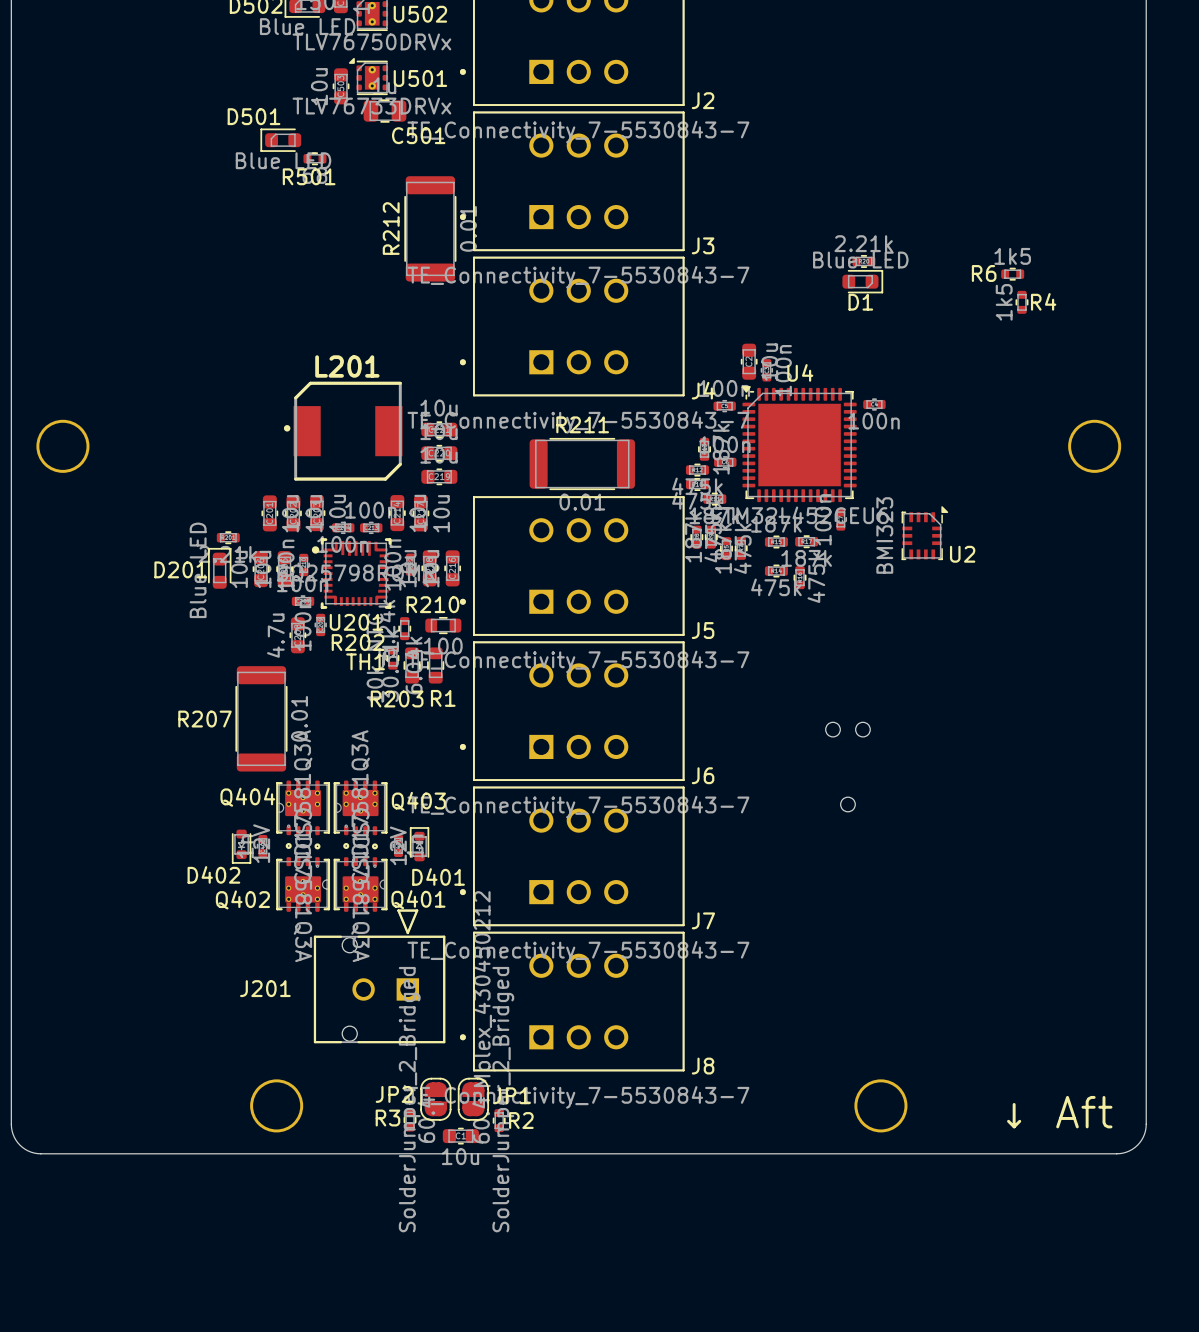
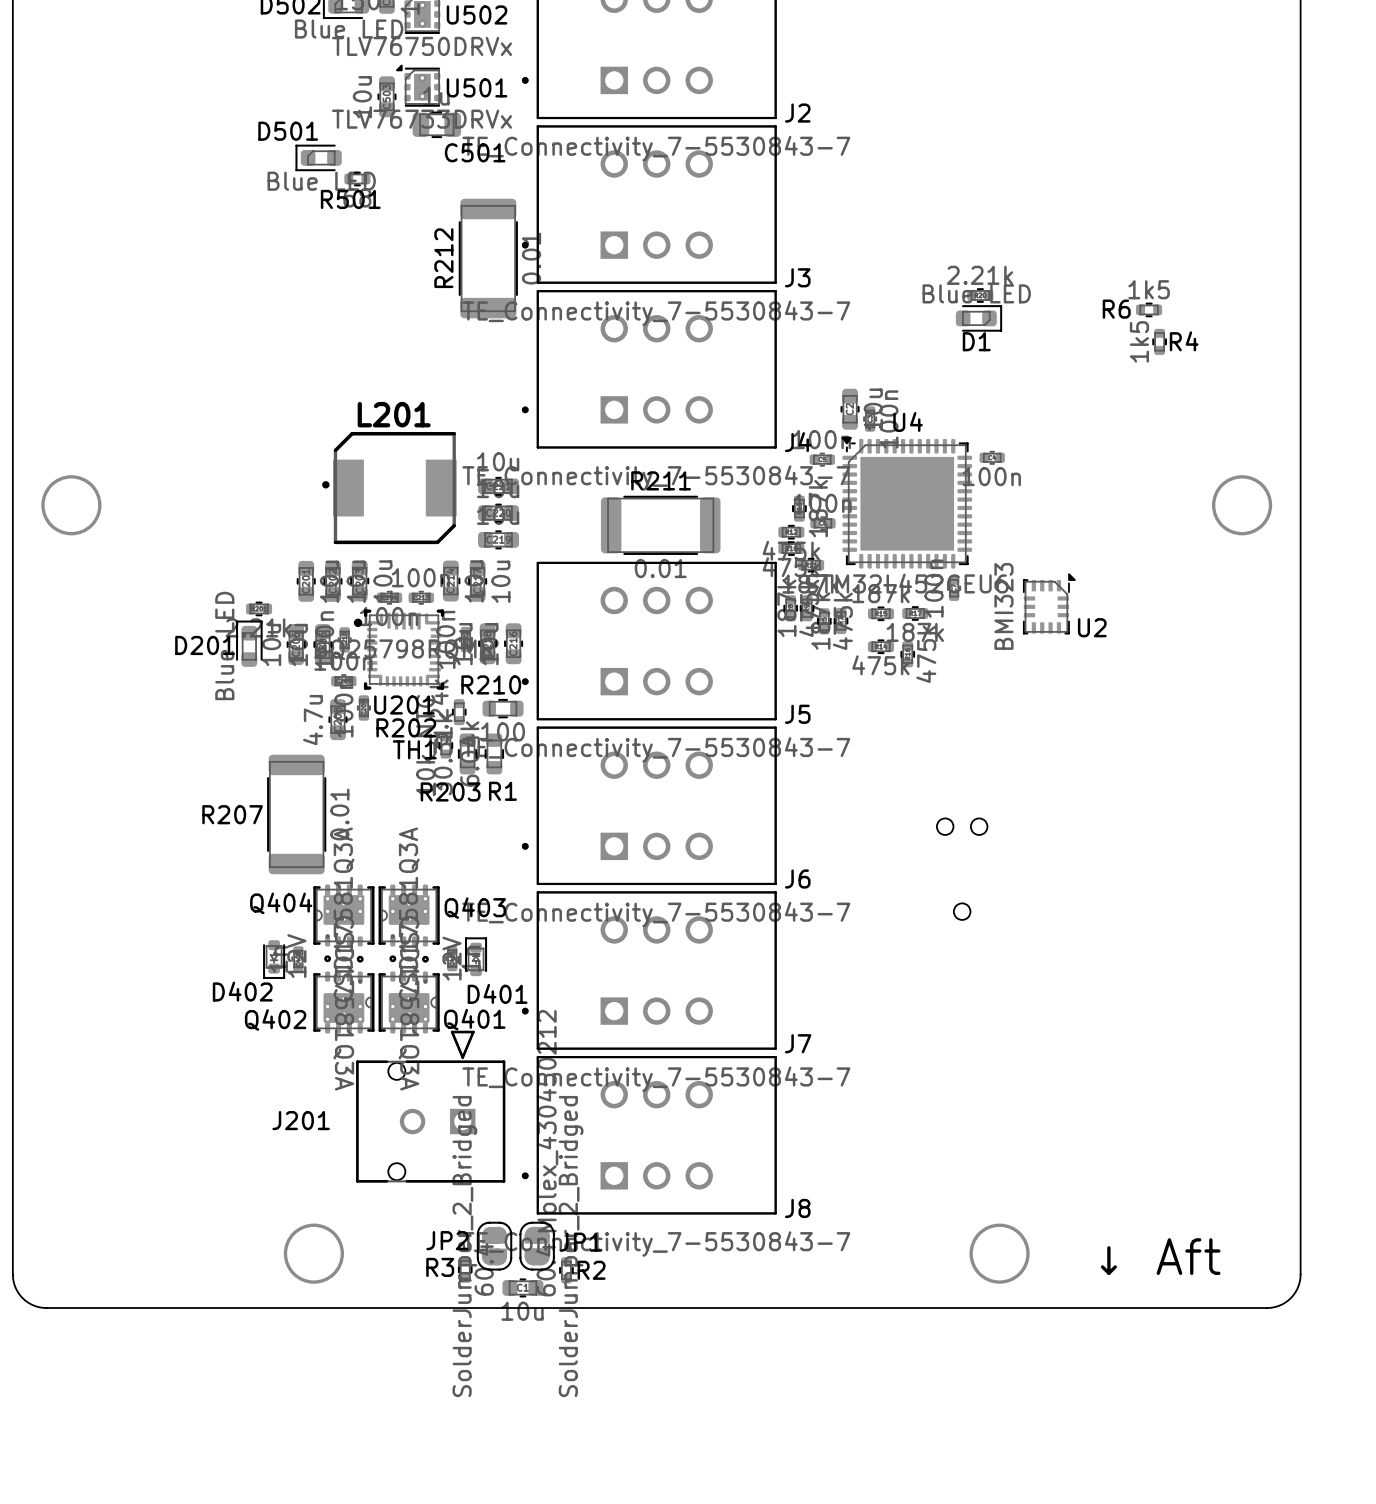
part text position: ↓ Aft (1059, 1112) -> ↓ Aft (1160, 1256)

